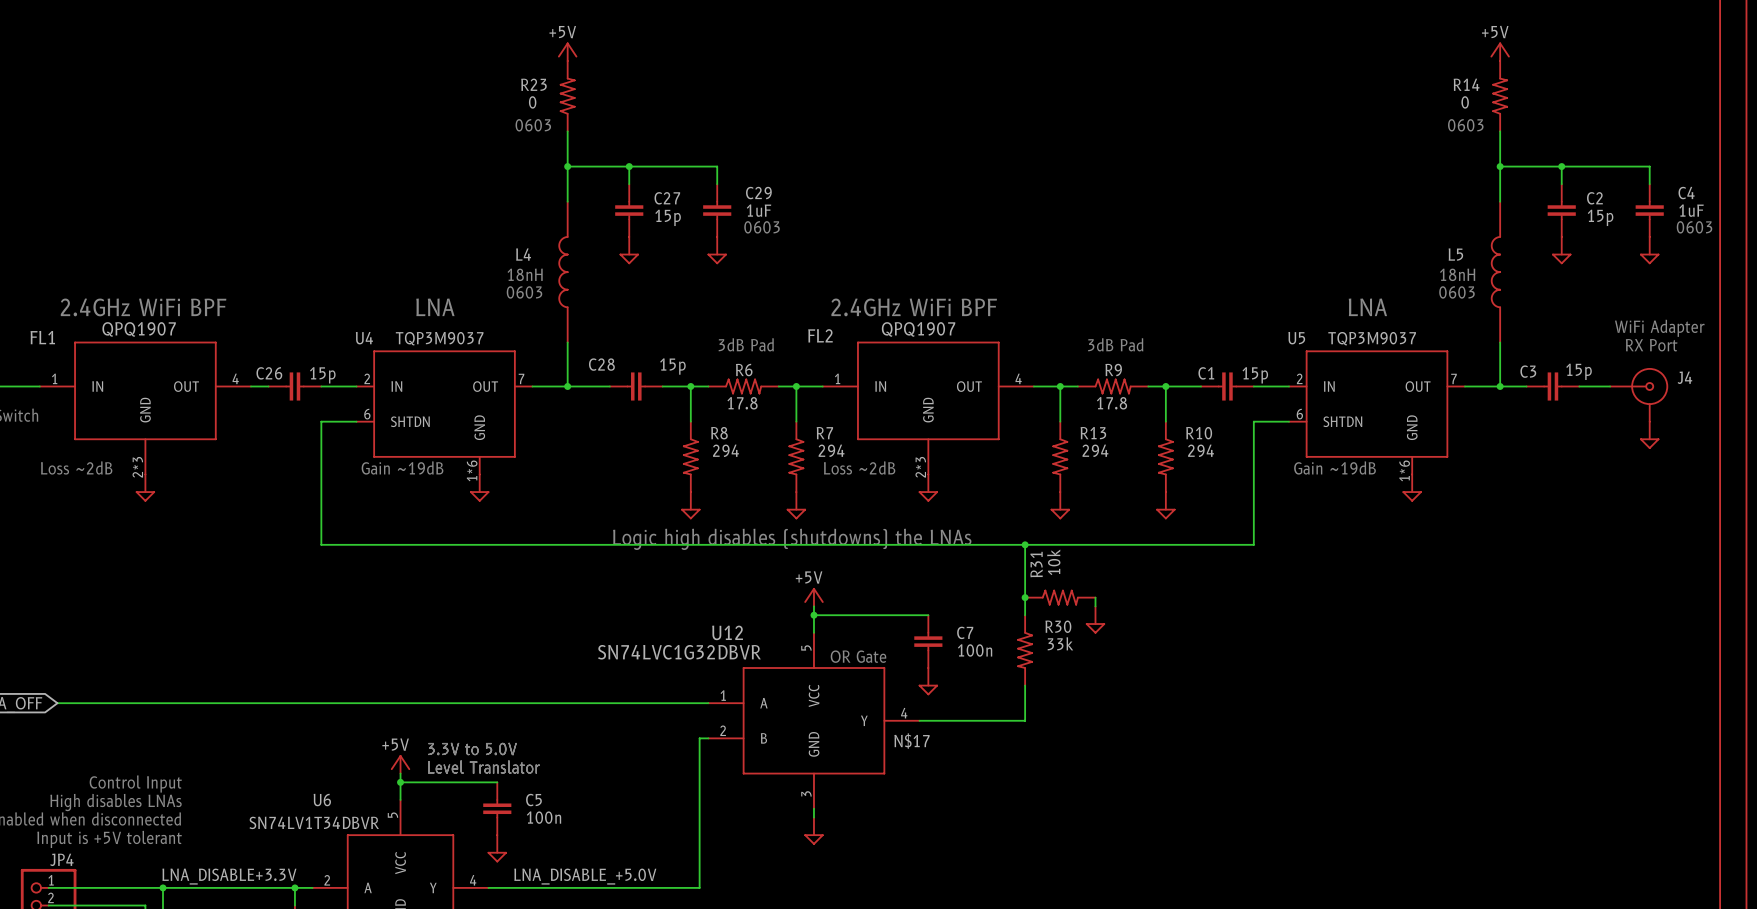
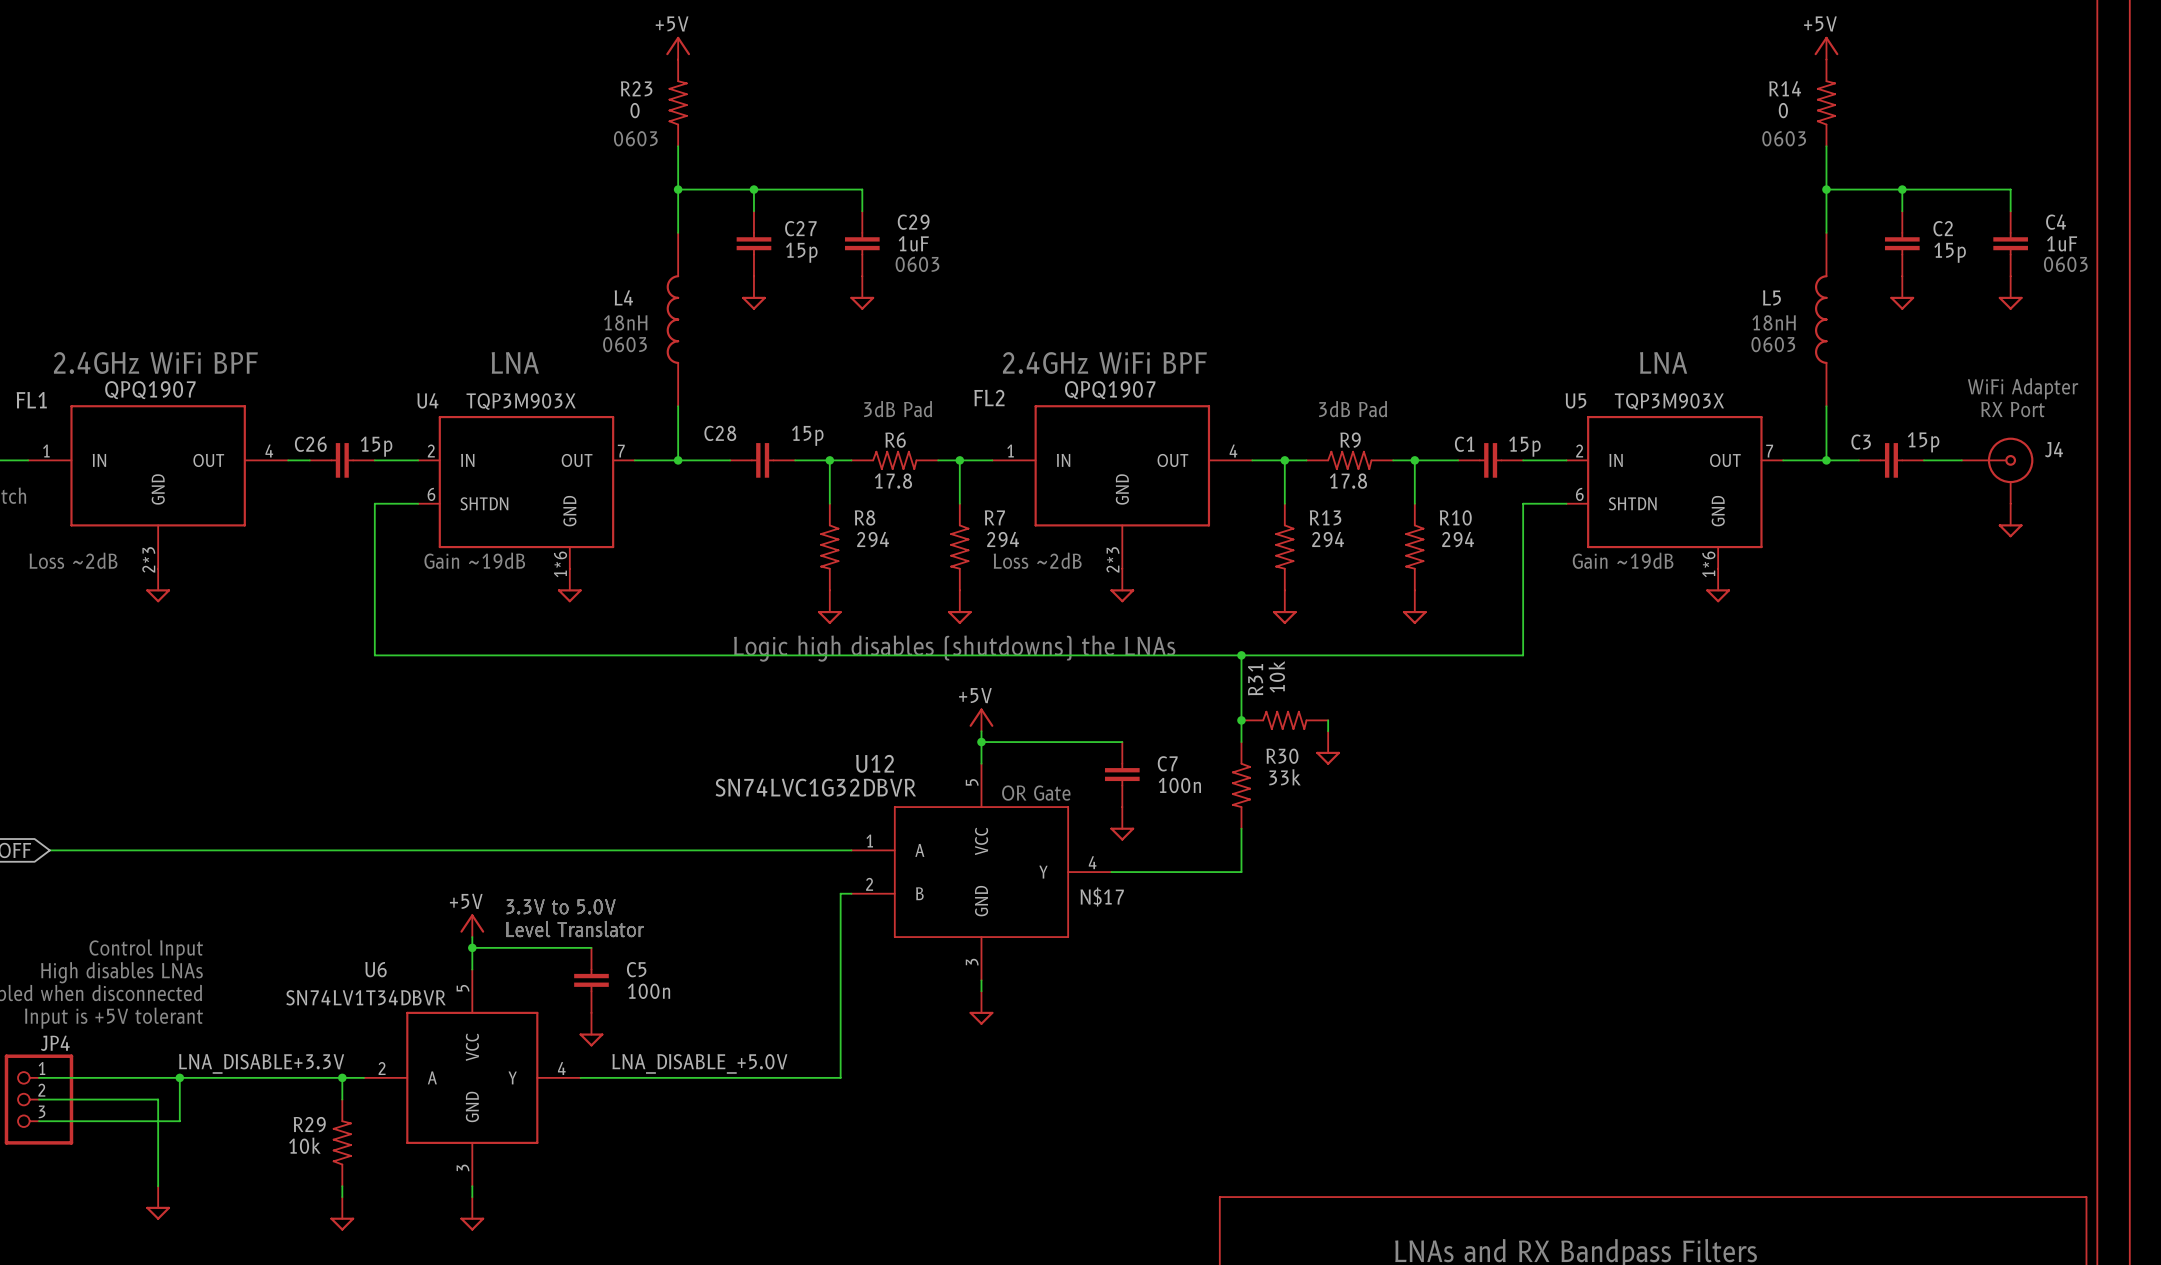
U4 value: TQP3M9037 (439, 338) -> TQP3M903X (521, 401)
U5 value: TQP3M9037 (1372, 338) -> TQP3M903X (1669, 401)

